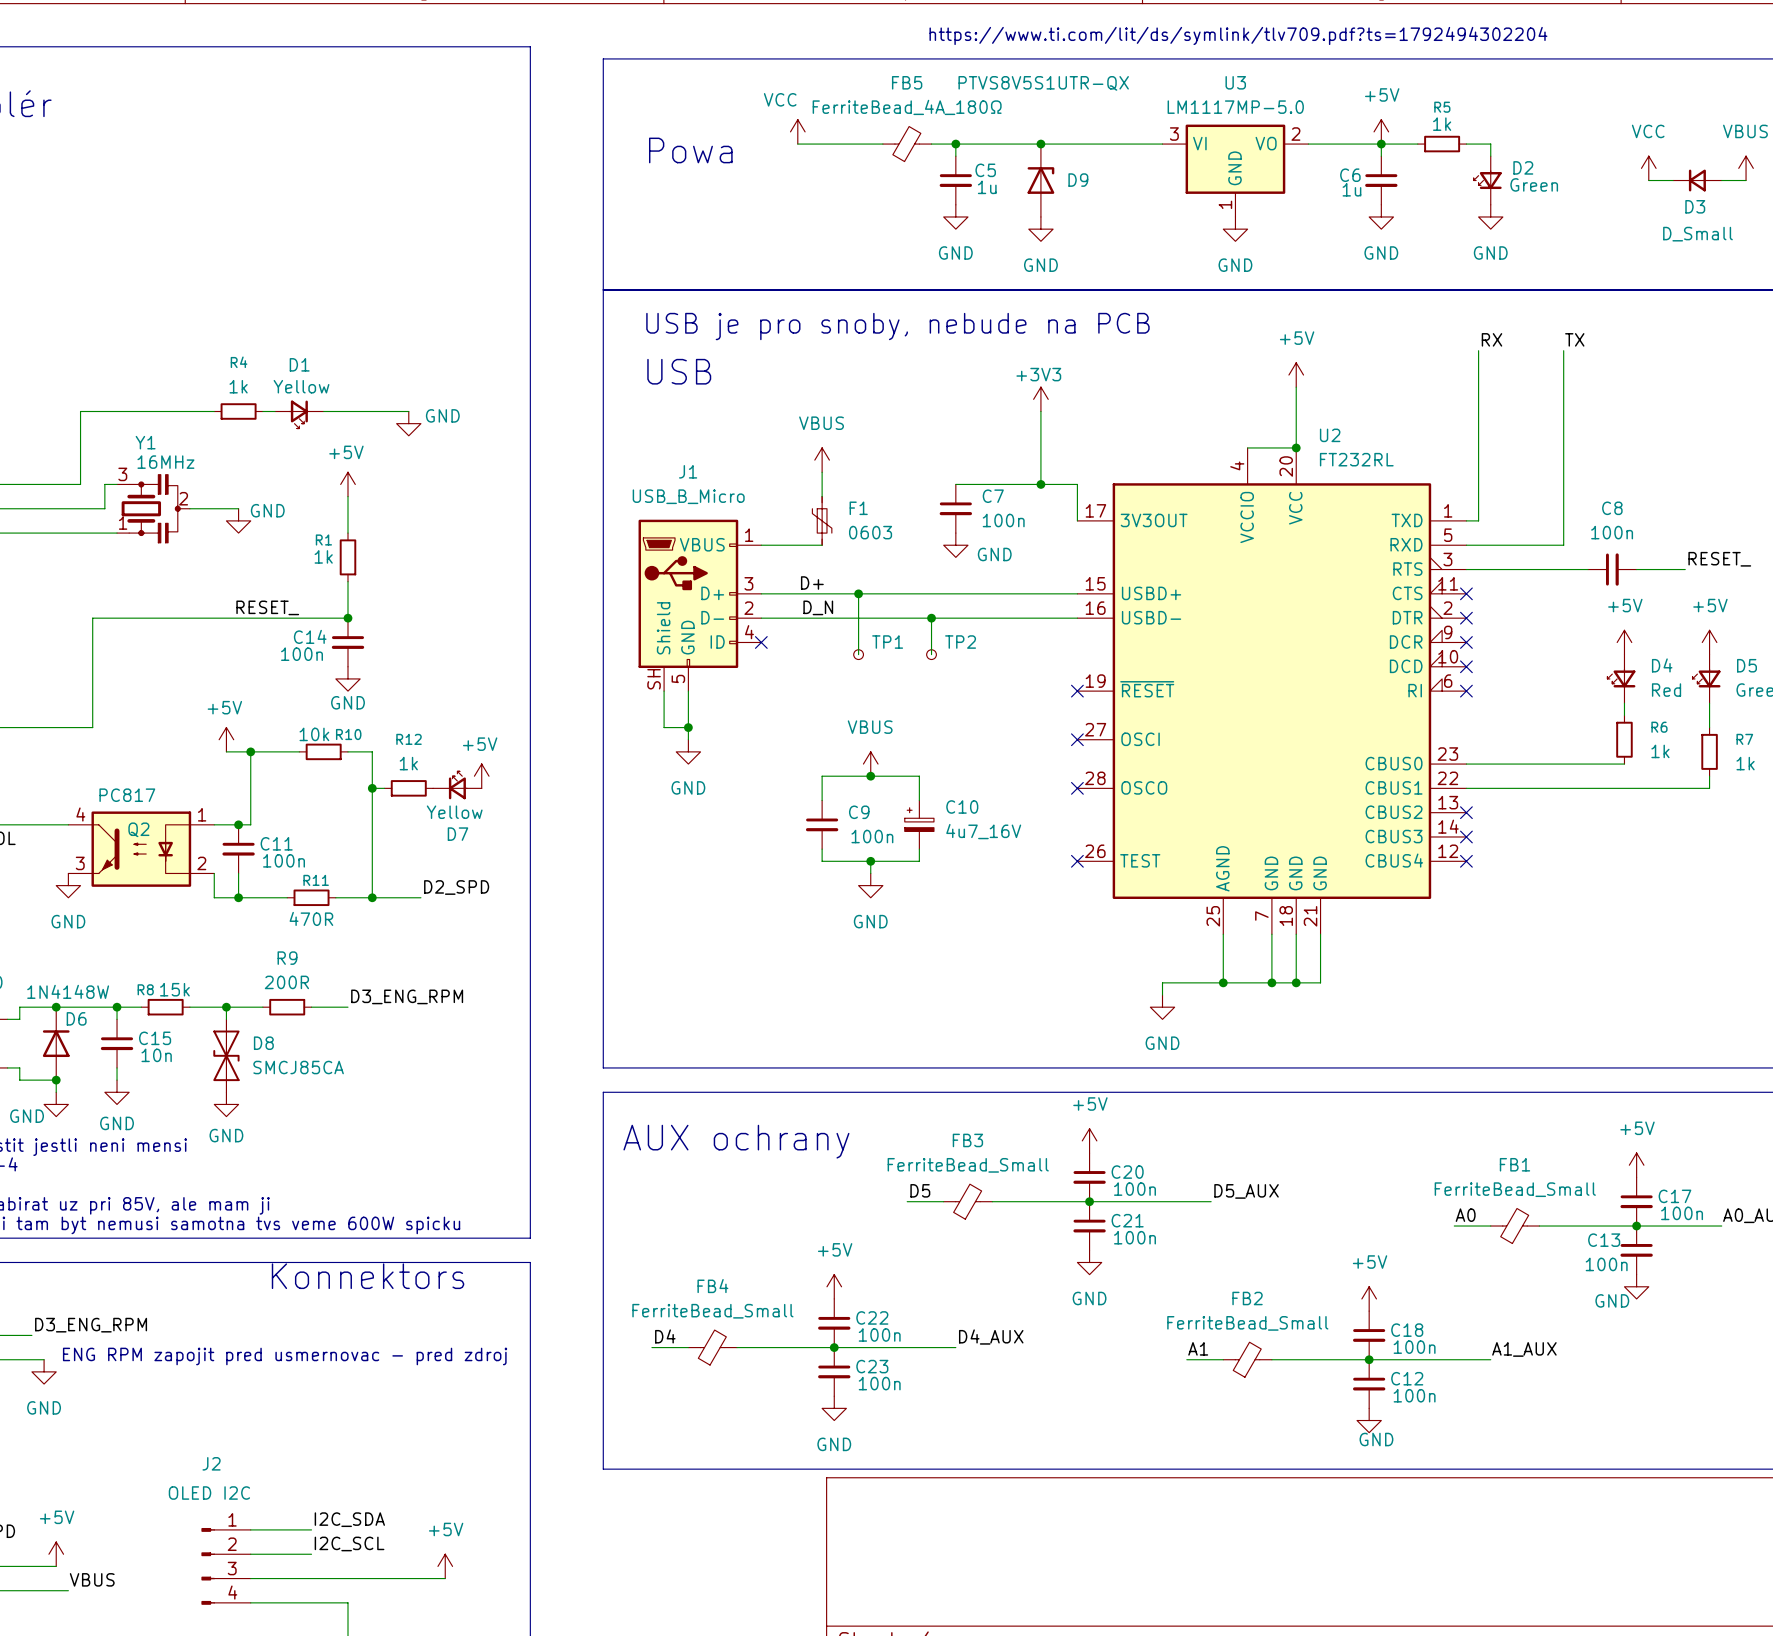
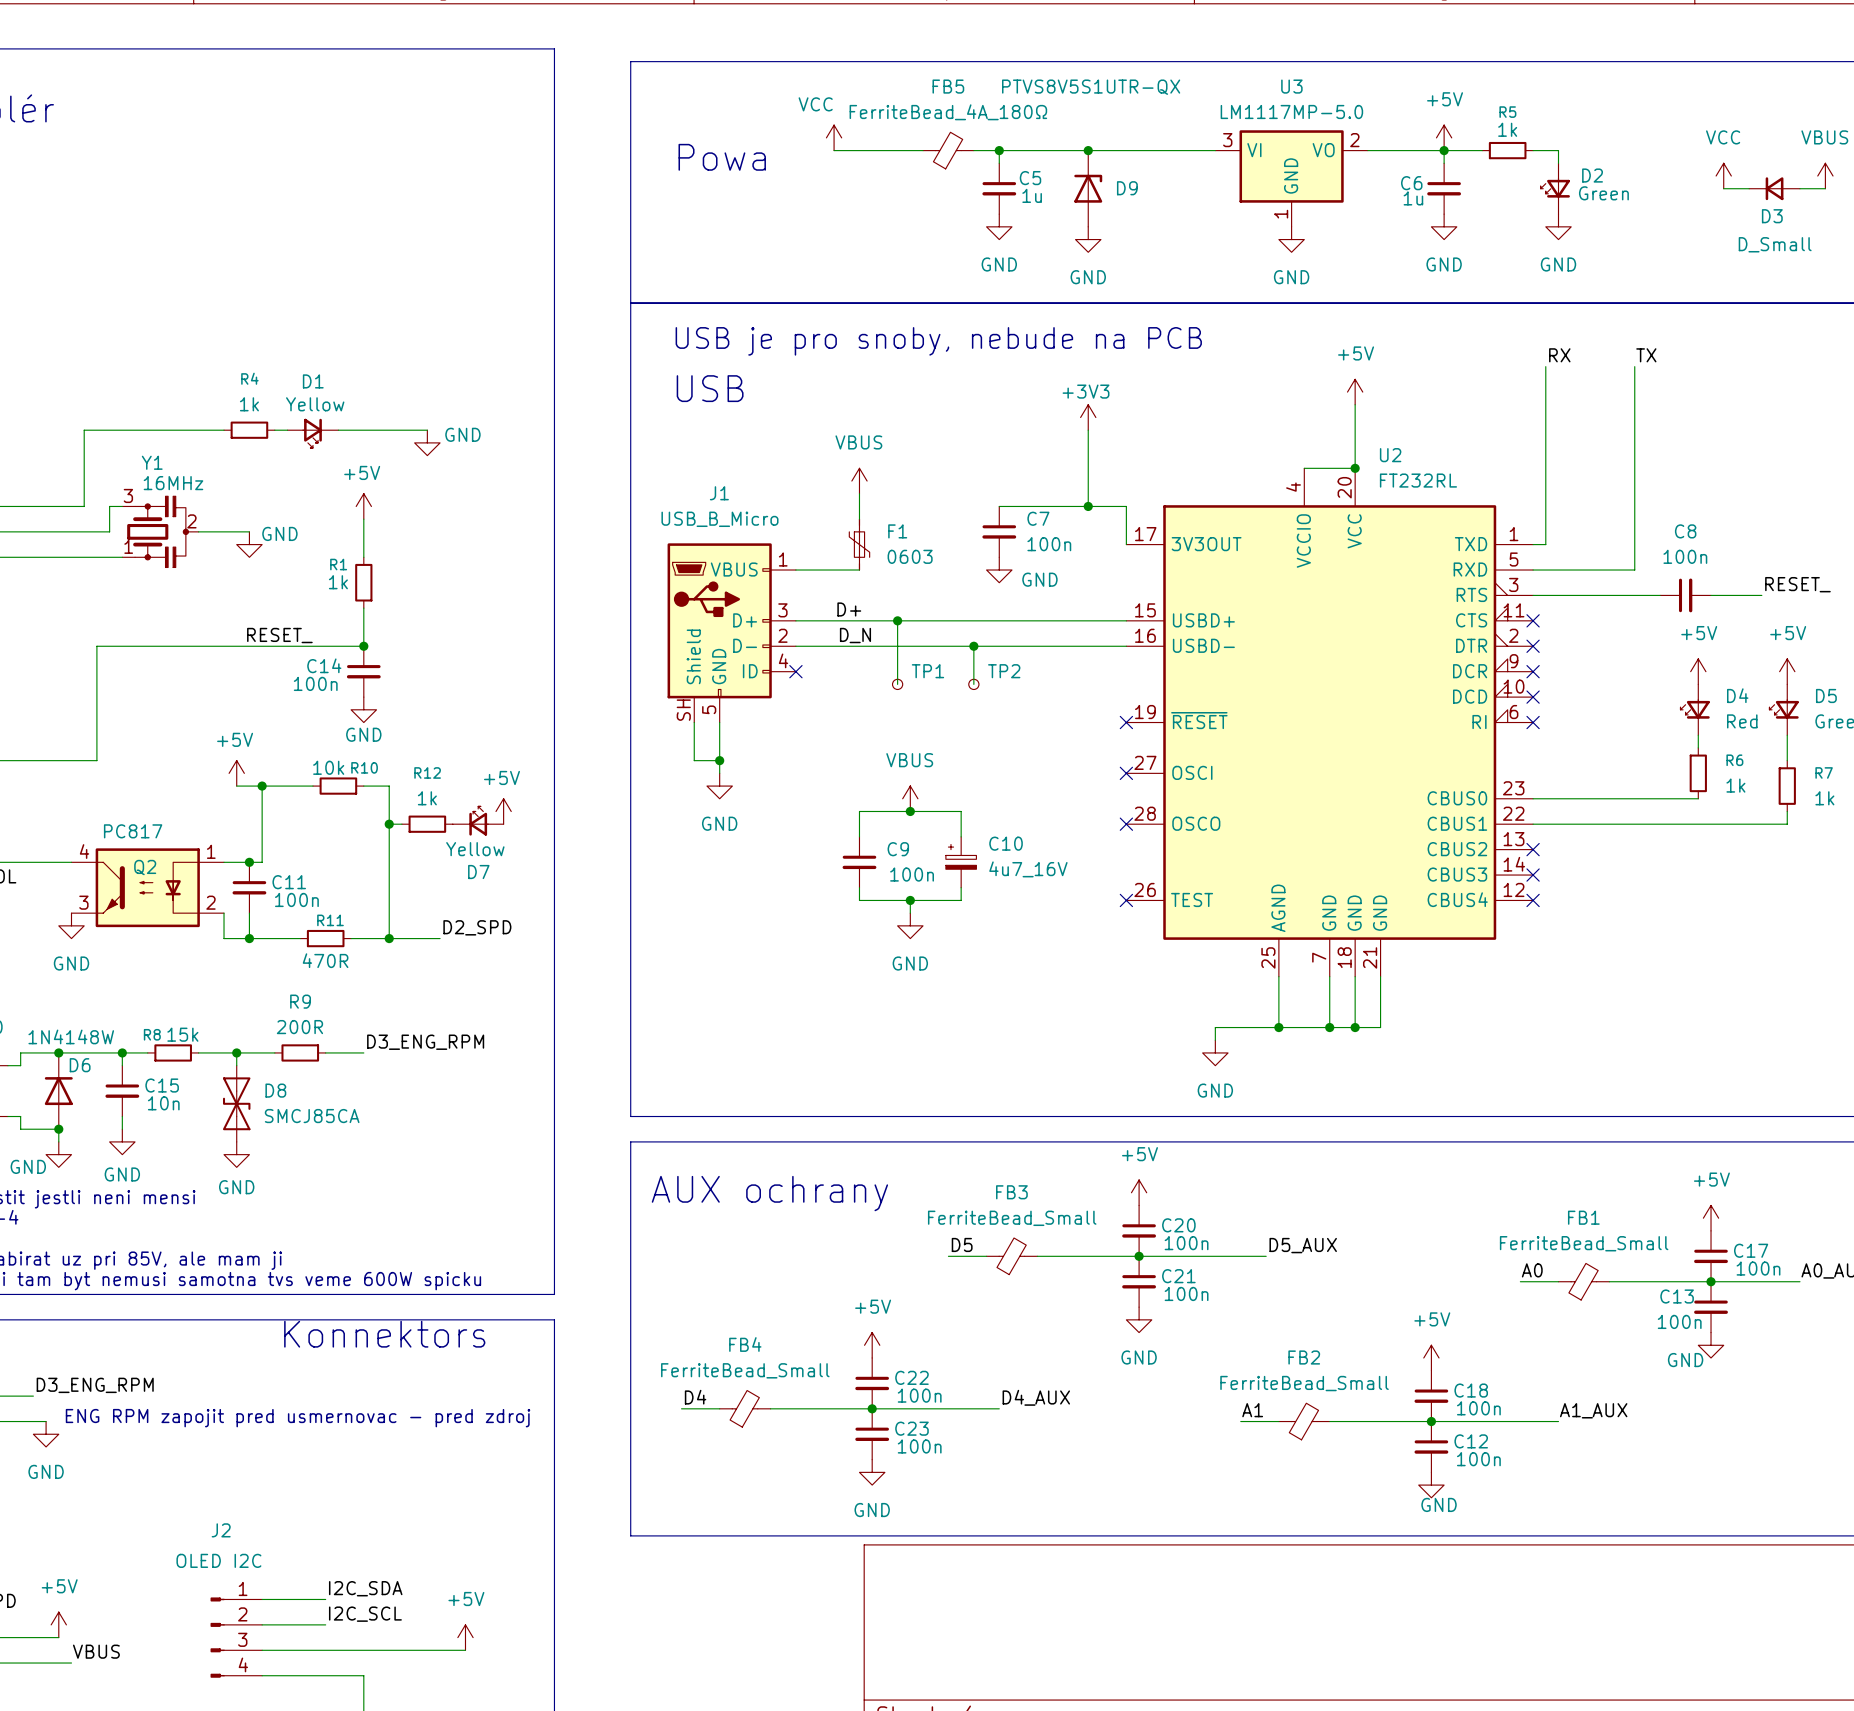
text: https://www.ti.com/lit/ds/symlink/tlv709.pdf?ts=1792494302204 (1238, 35) -> none

